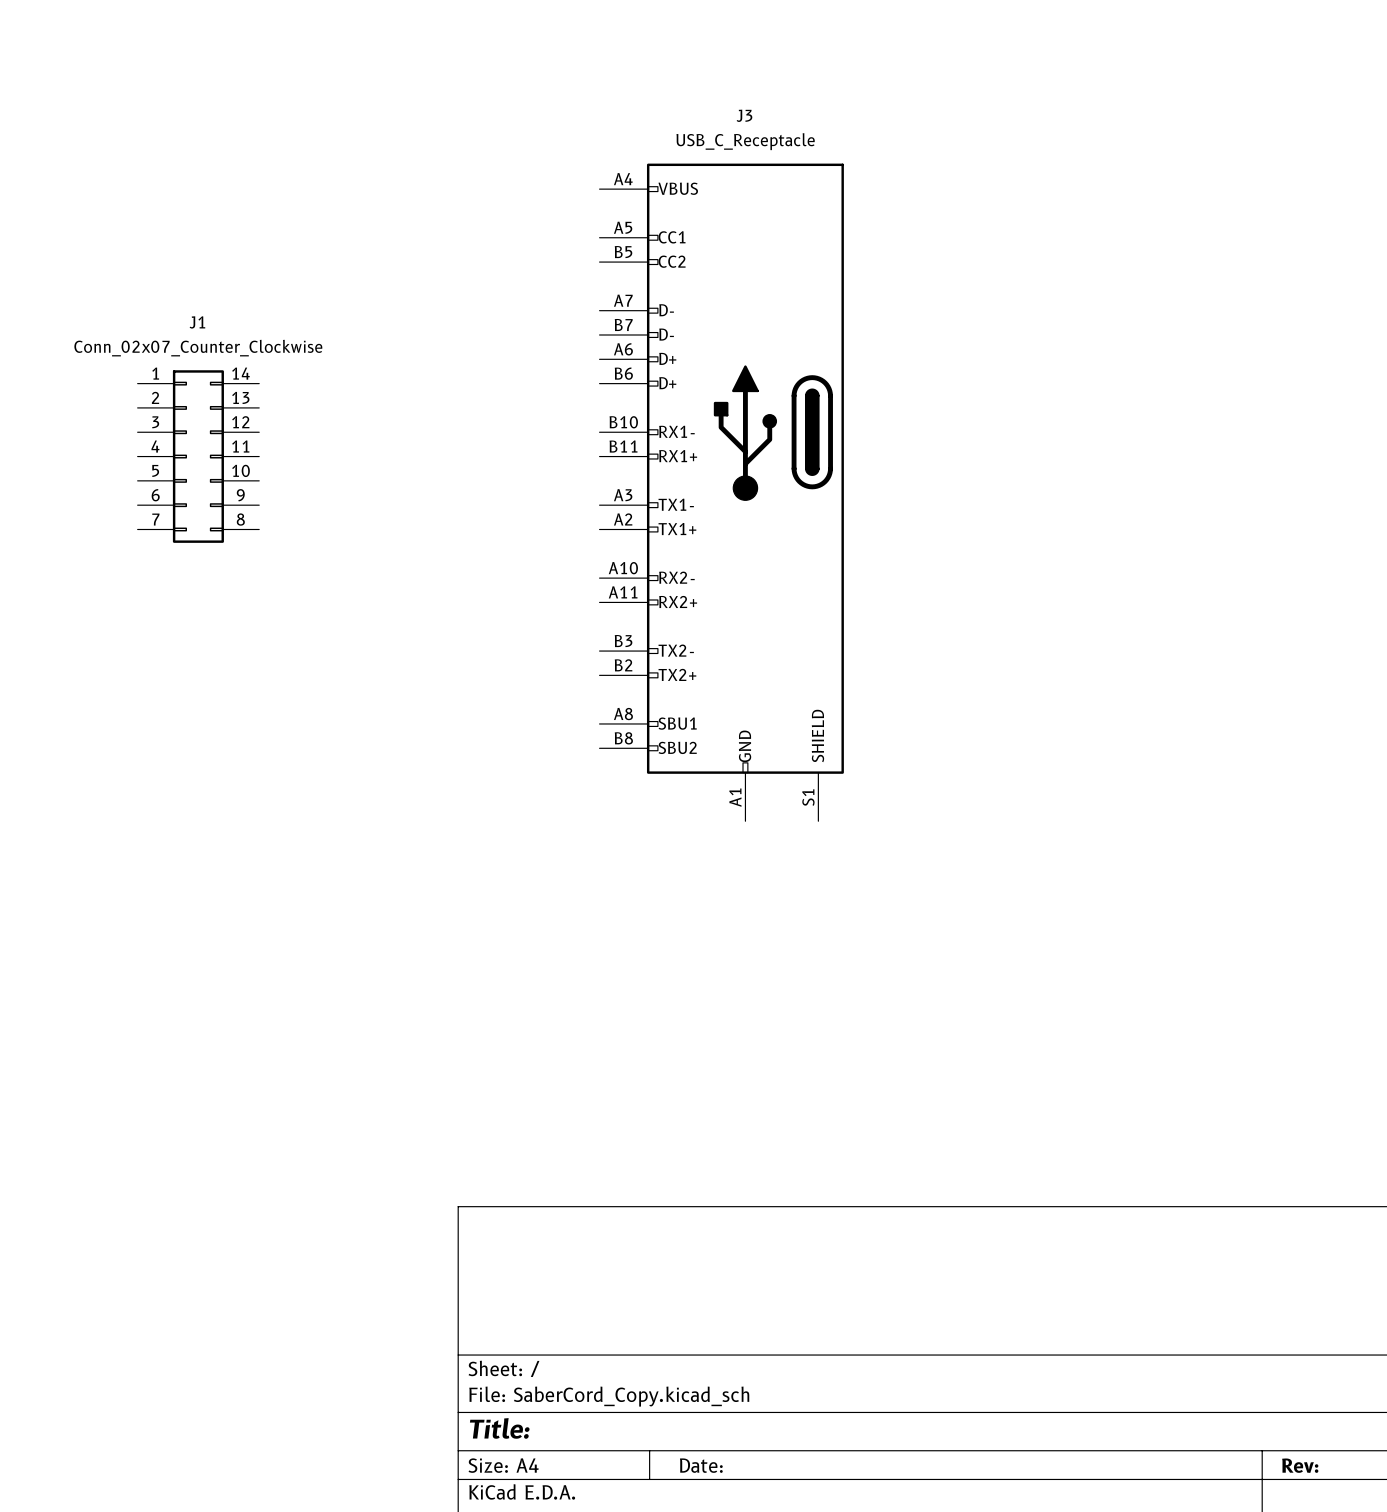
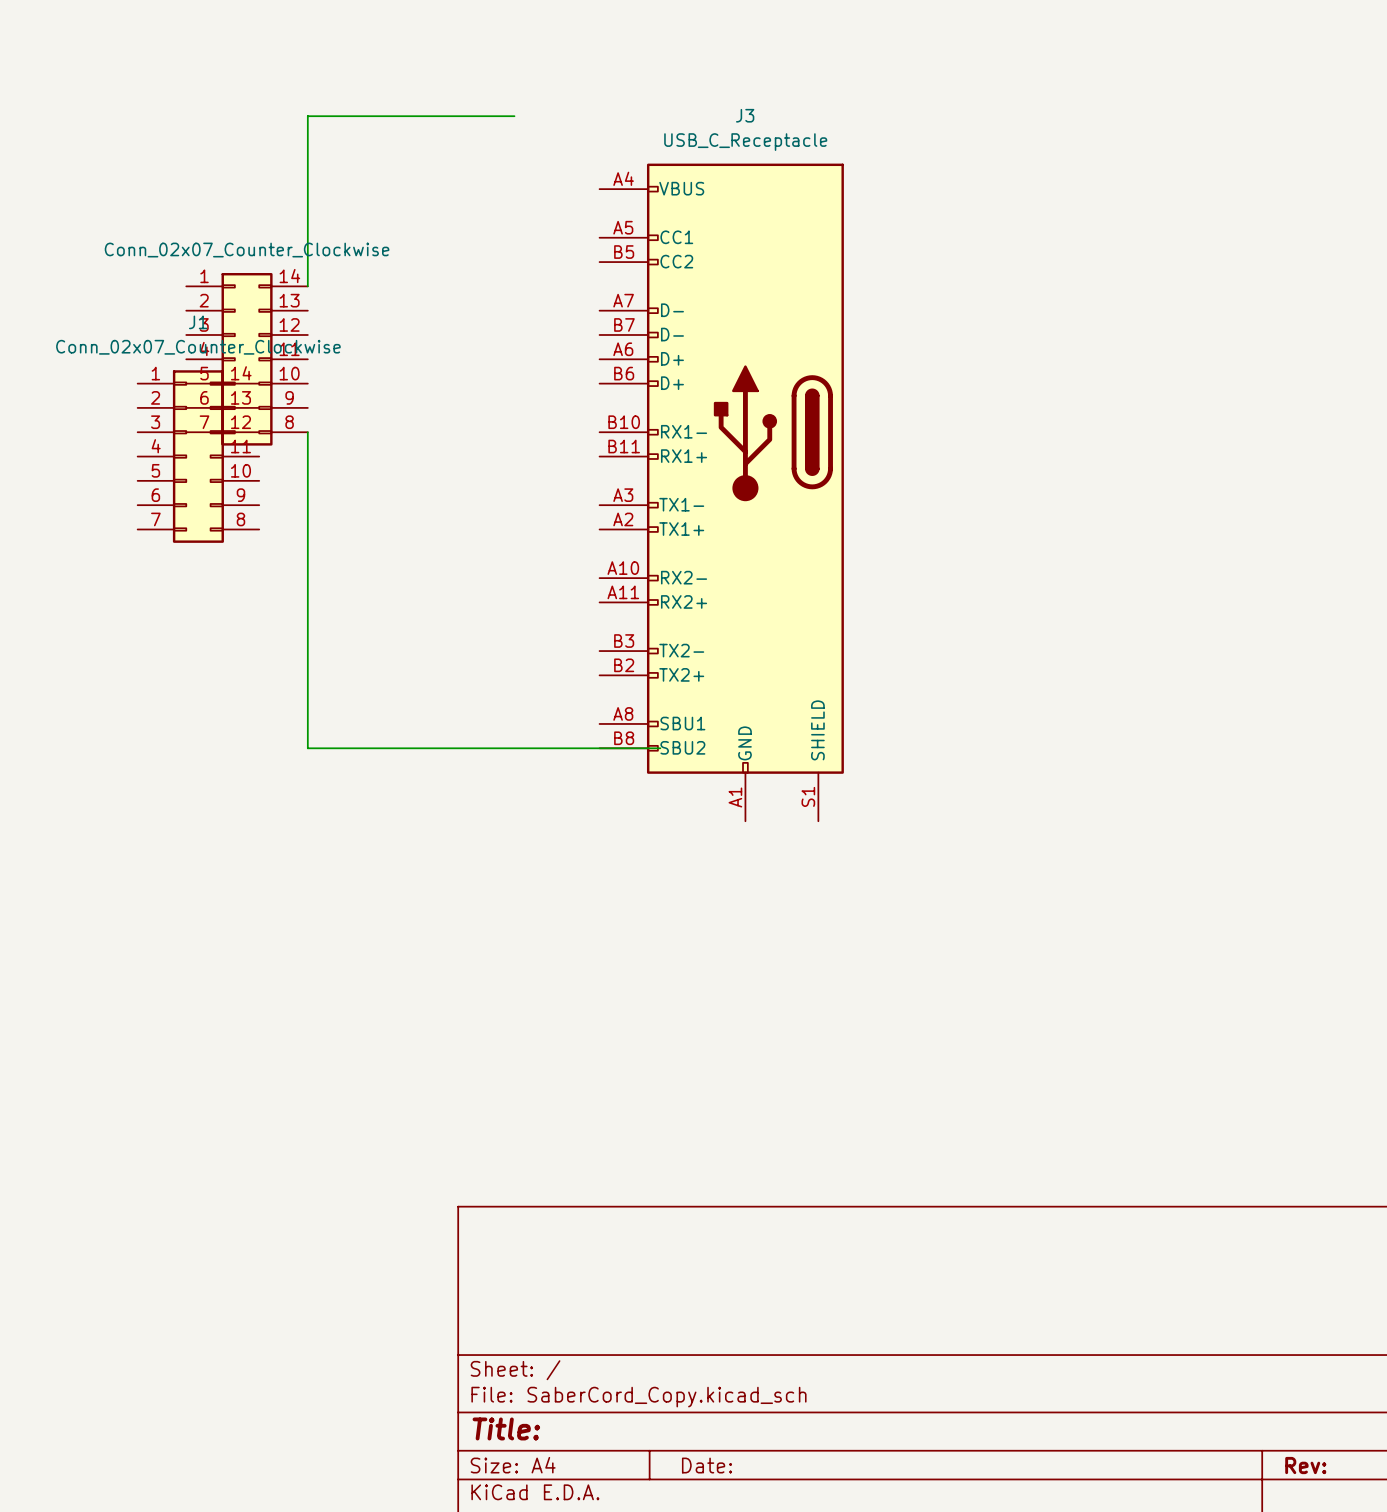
wire: none -> (514, 116) (307, 116) (307, 286)
part: none -> Conn_02x07_Counter_Clockwise (247, 359)
wire: none -> (307, 432) (307, 748) (660, 748)

